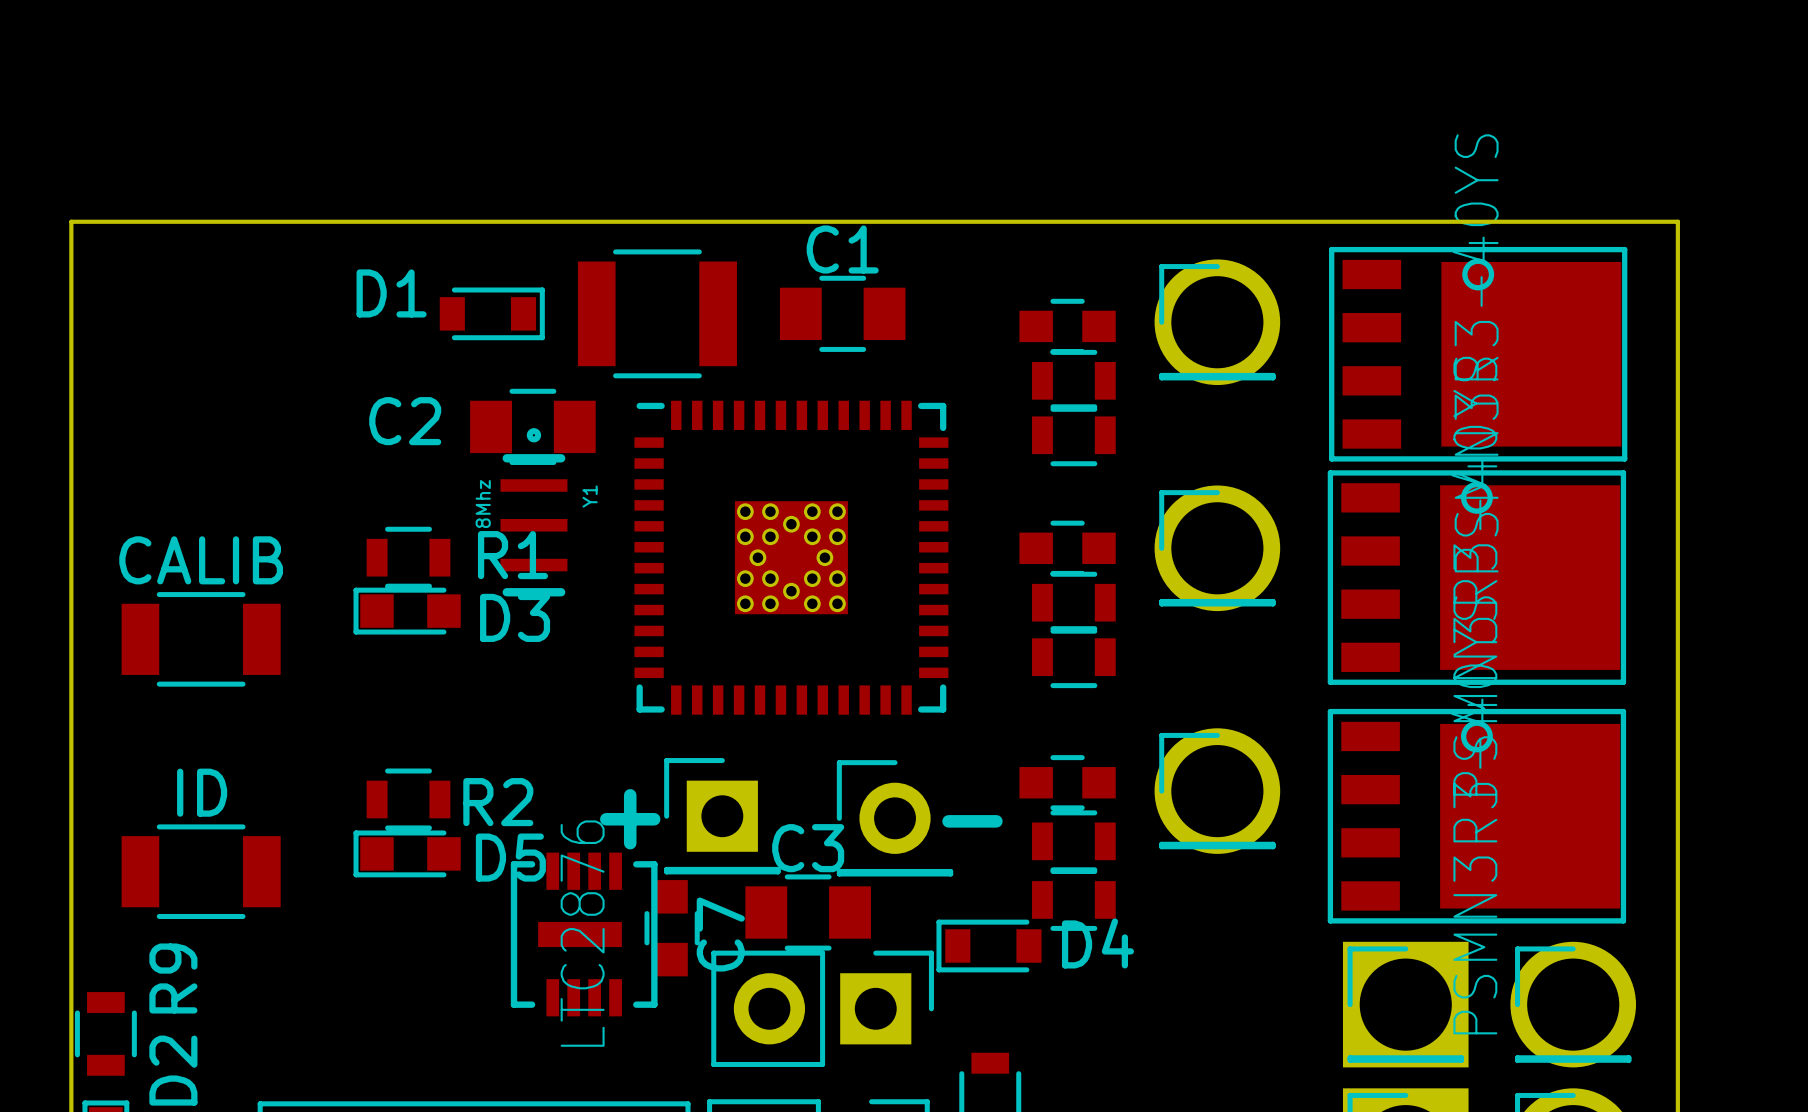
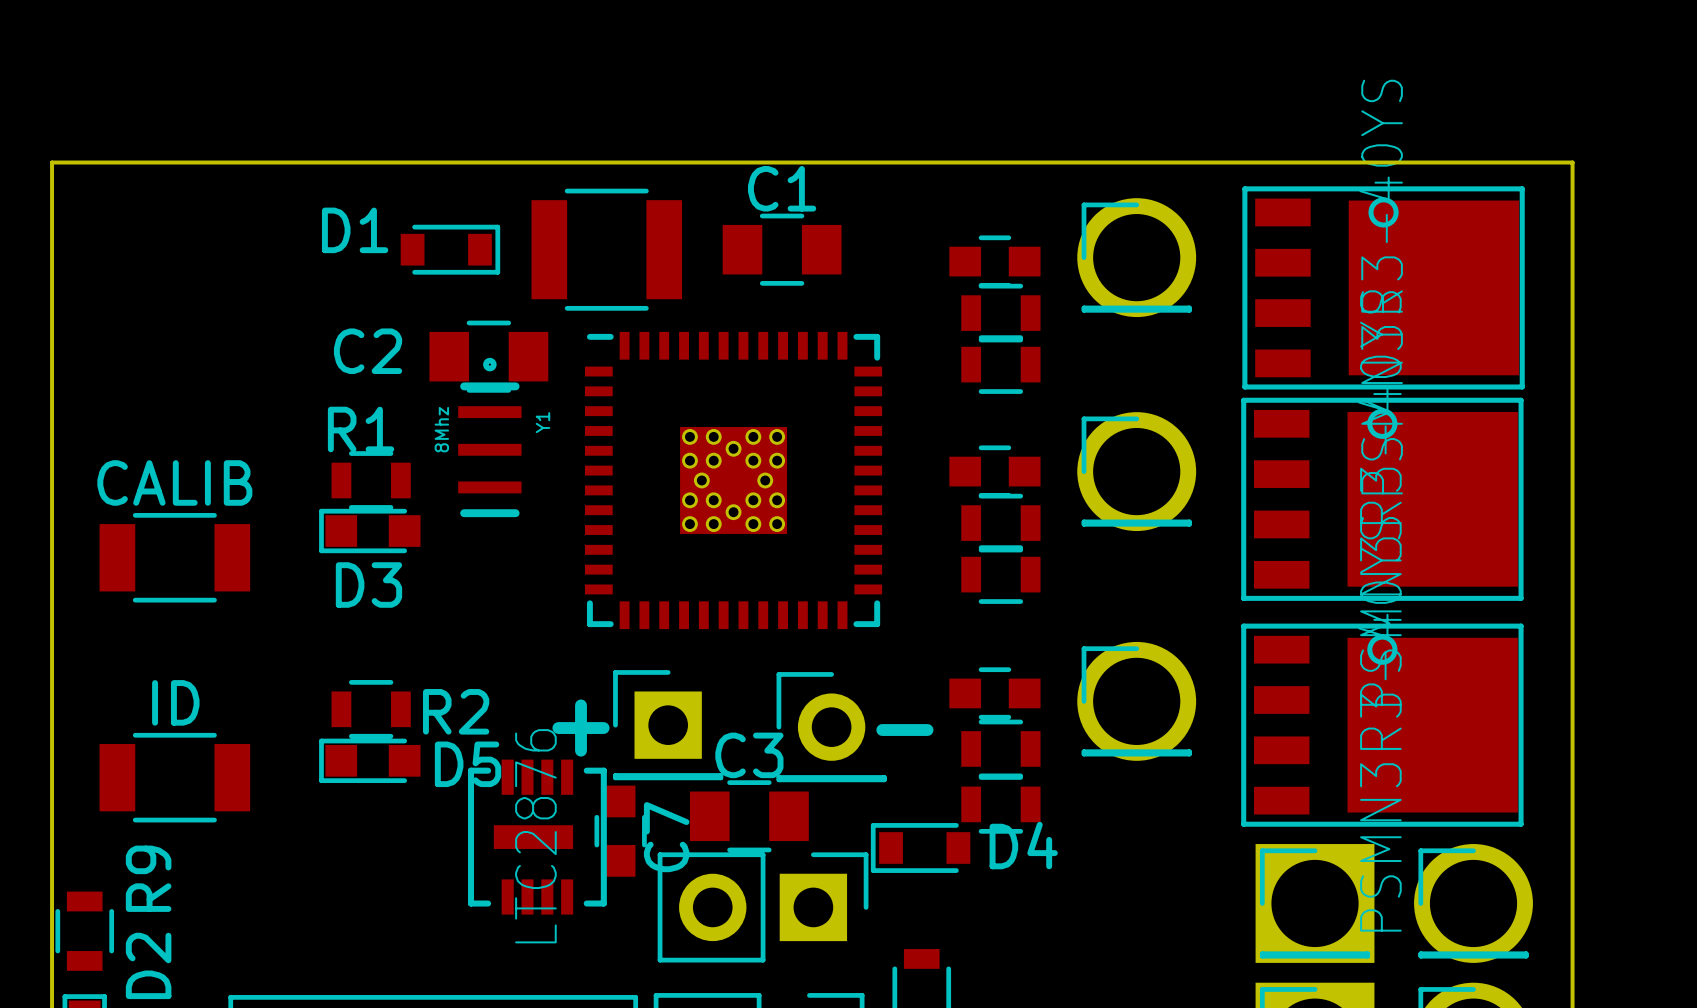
R1 name position: R1 (512, 555) -> R1 (361, 429)
D3 name position: D3 (515, 617) -> D3 (368, 585)

